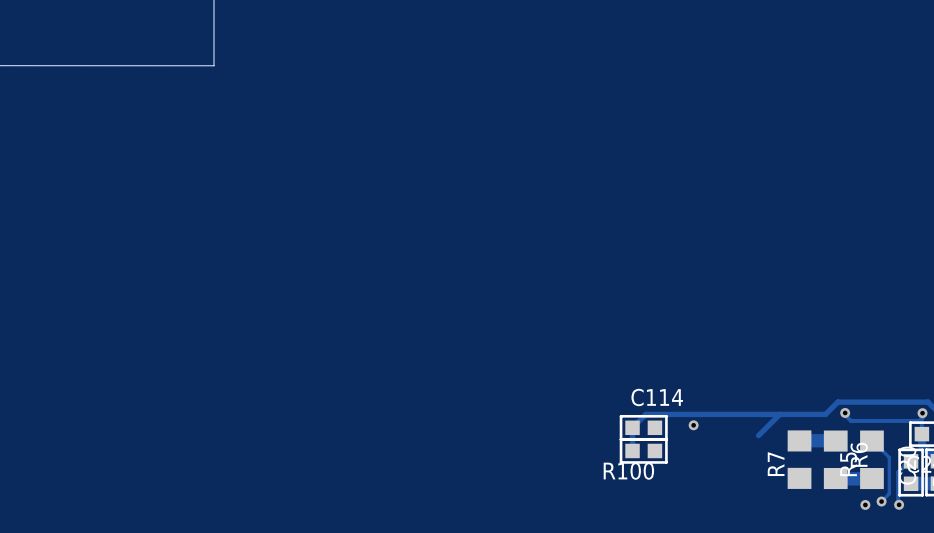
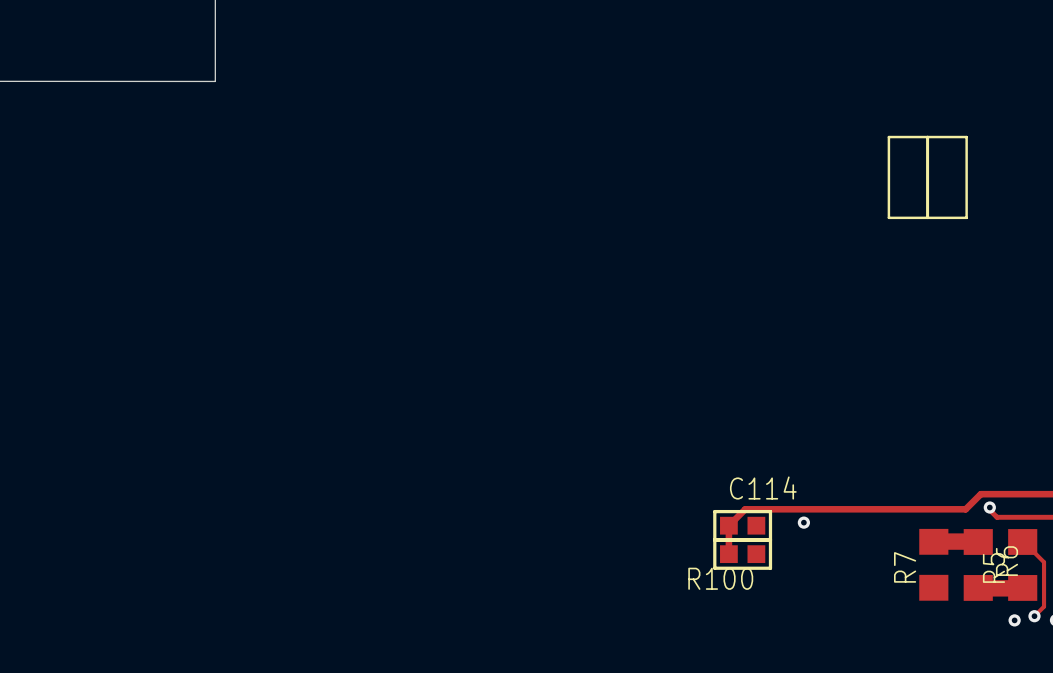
part: none -> (908, 177)
part: none -> (947, 177)
track: (779, 414) (758, 435) -> none

